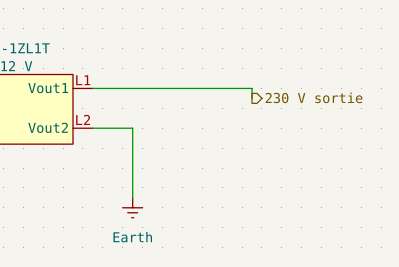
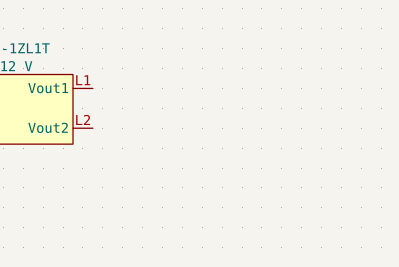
wire: (92, 88) (252, 88) (252, 98) -> none
hierarchical label: 230 V sortie (314, 97) -> none
wire: (92, 128) (132, 128) (132, 197) -> none
power symbol: Earth (132, 207) -> none

